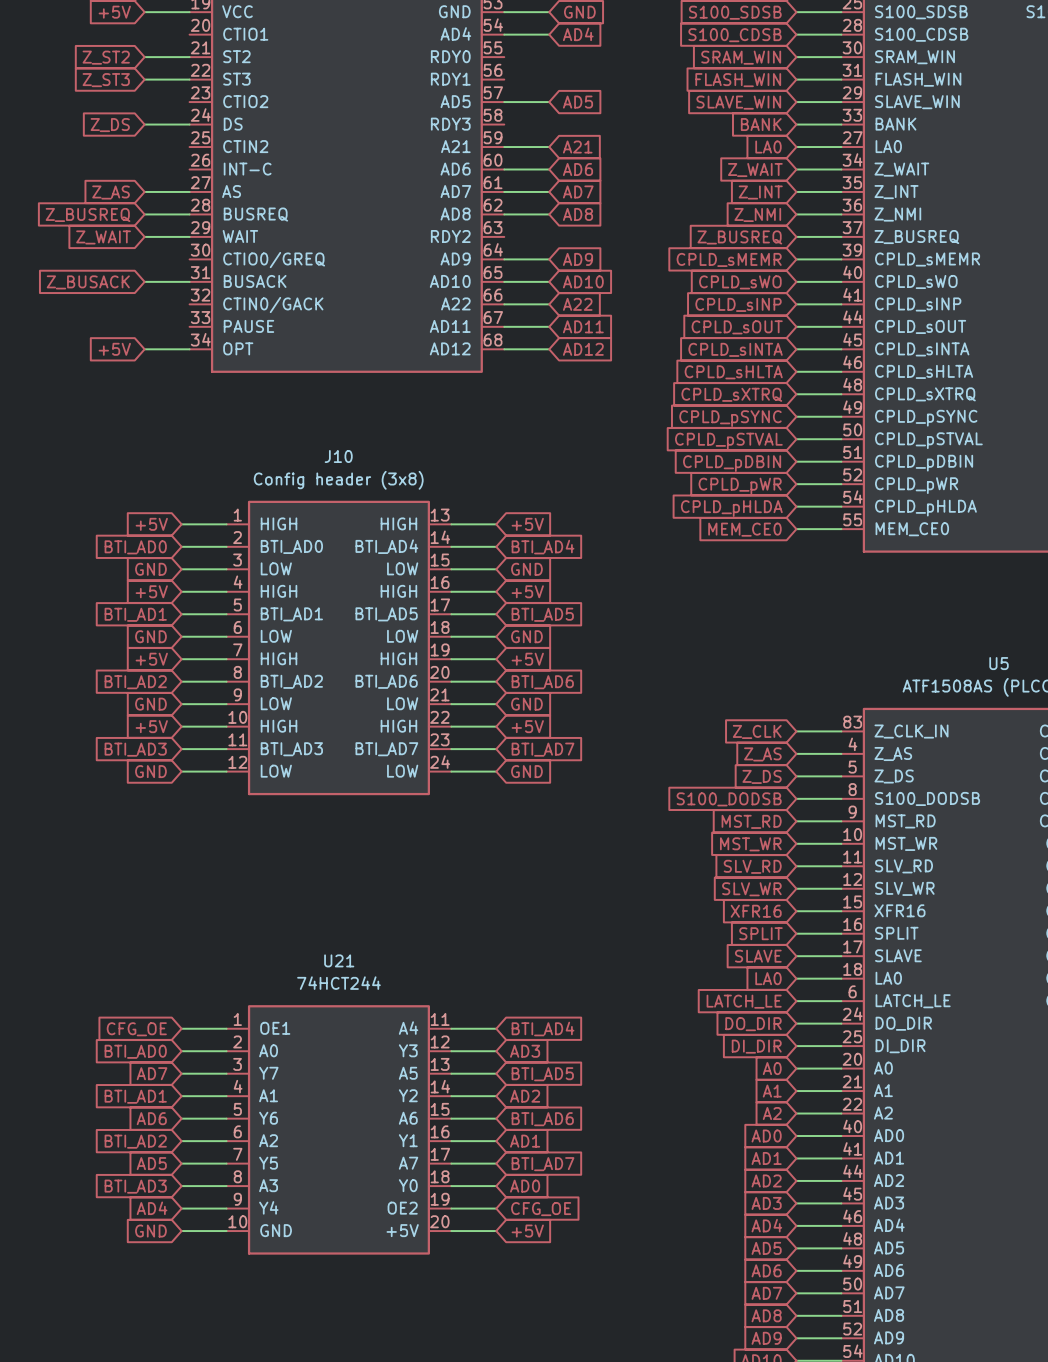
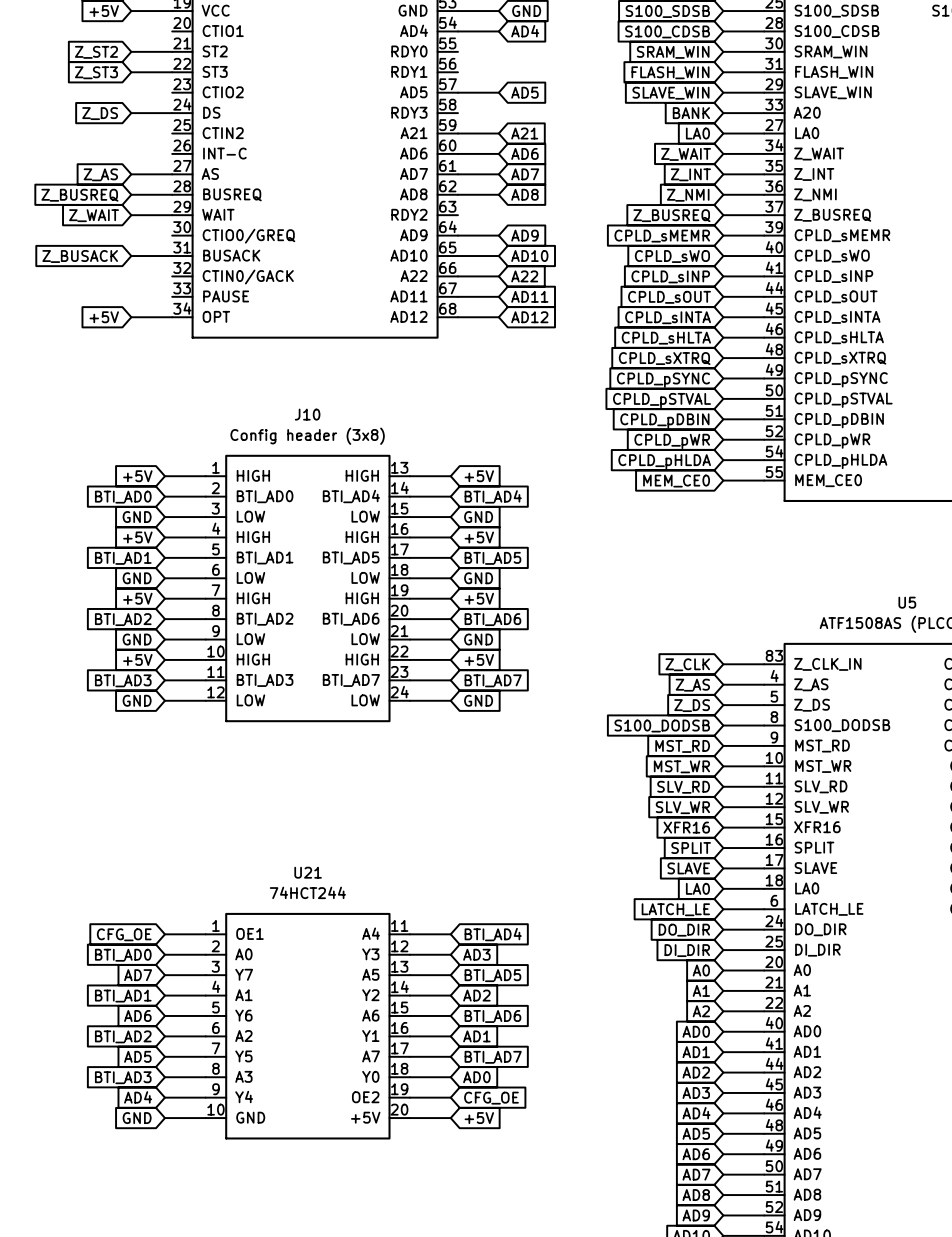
part pin name: BANK (895, 124) -> A20 (807, 112)

